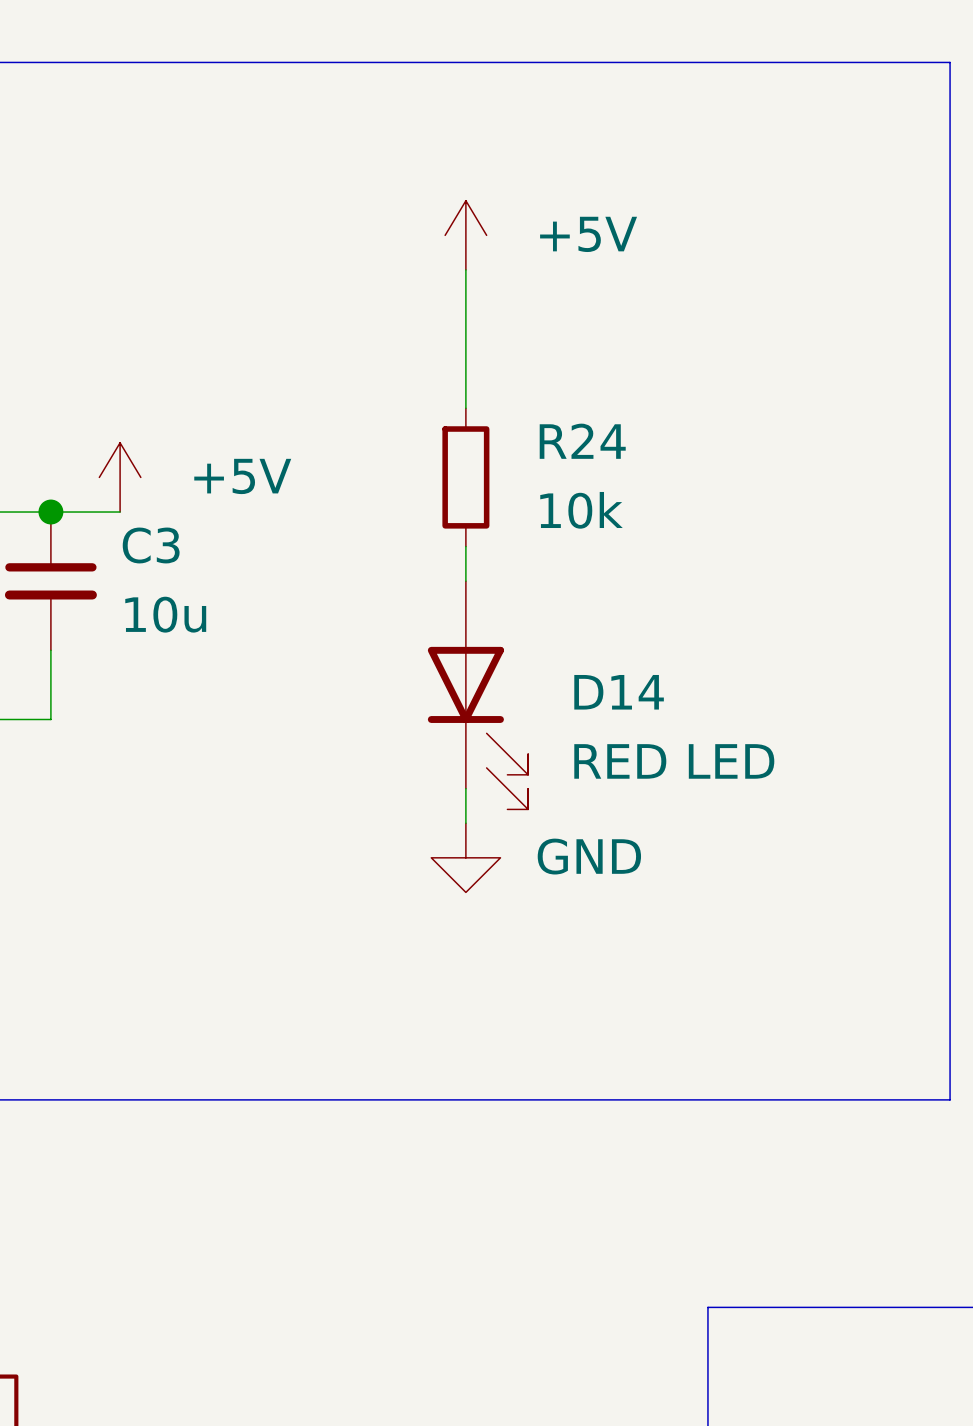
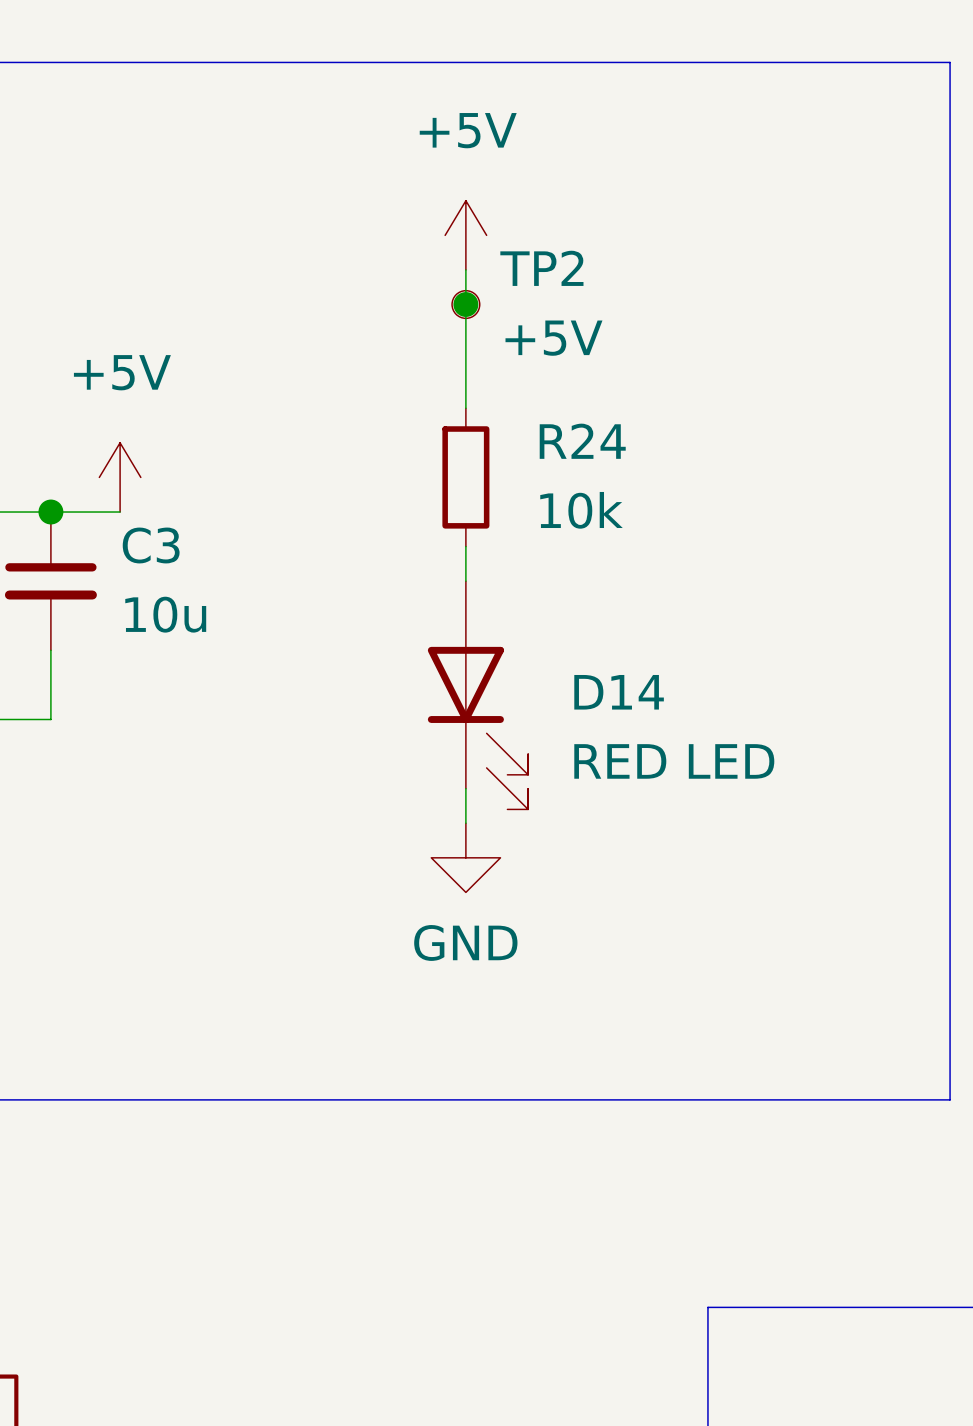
power symbol text position: +5V (588, 234) -> +5V (468, 130)
TP2: none -> +5V (465, 304)
junction: none -> (465, 304)
power symbol text position: +5V (242, 476) -> +5V (122, 372)
power symbol text position: GND (589, 856) -> GND (465, 942)

